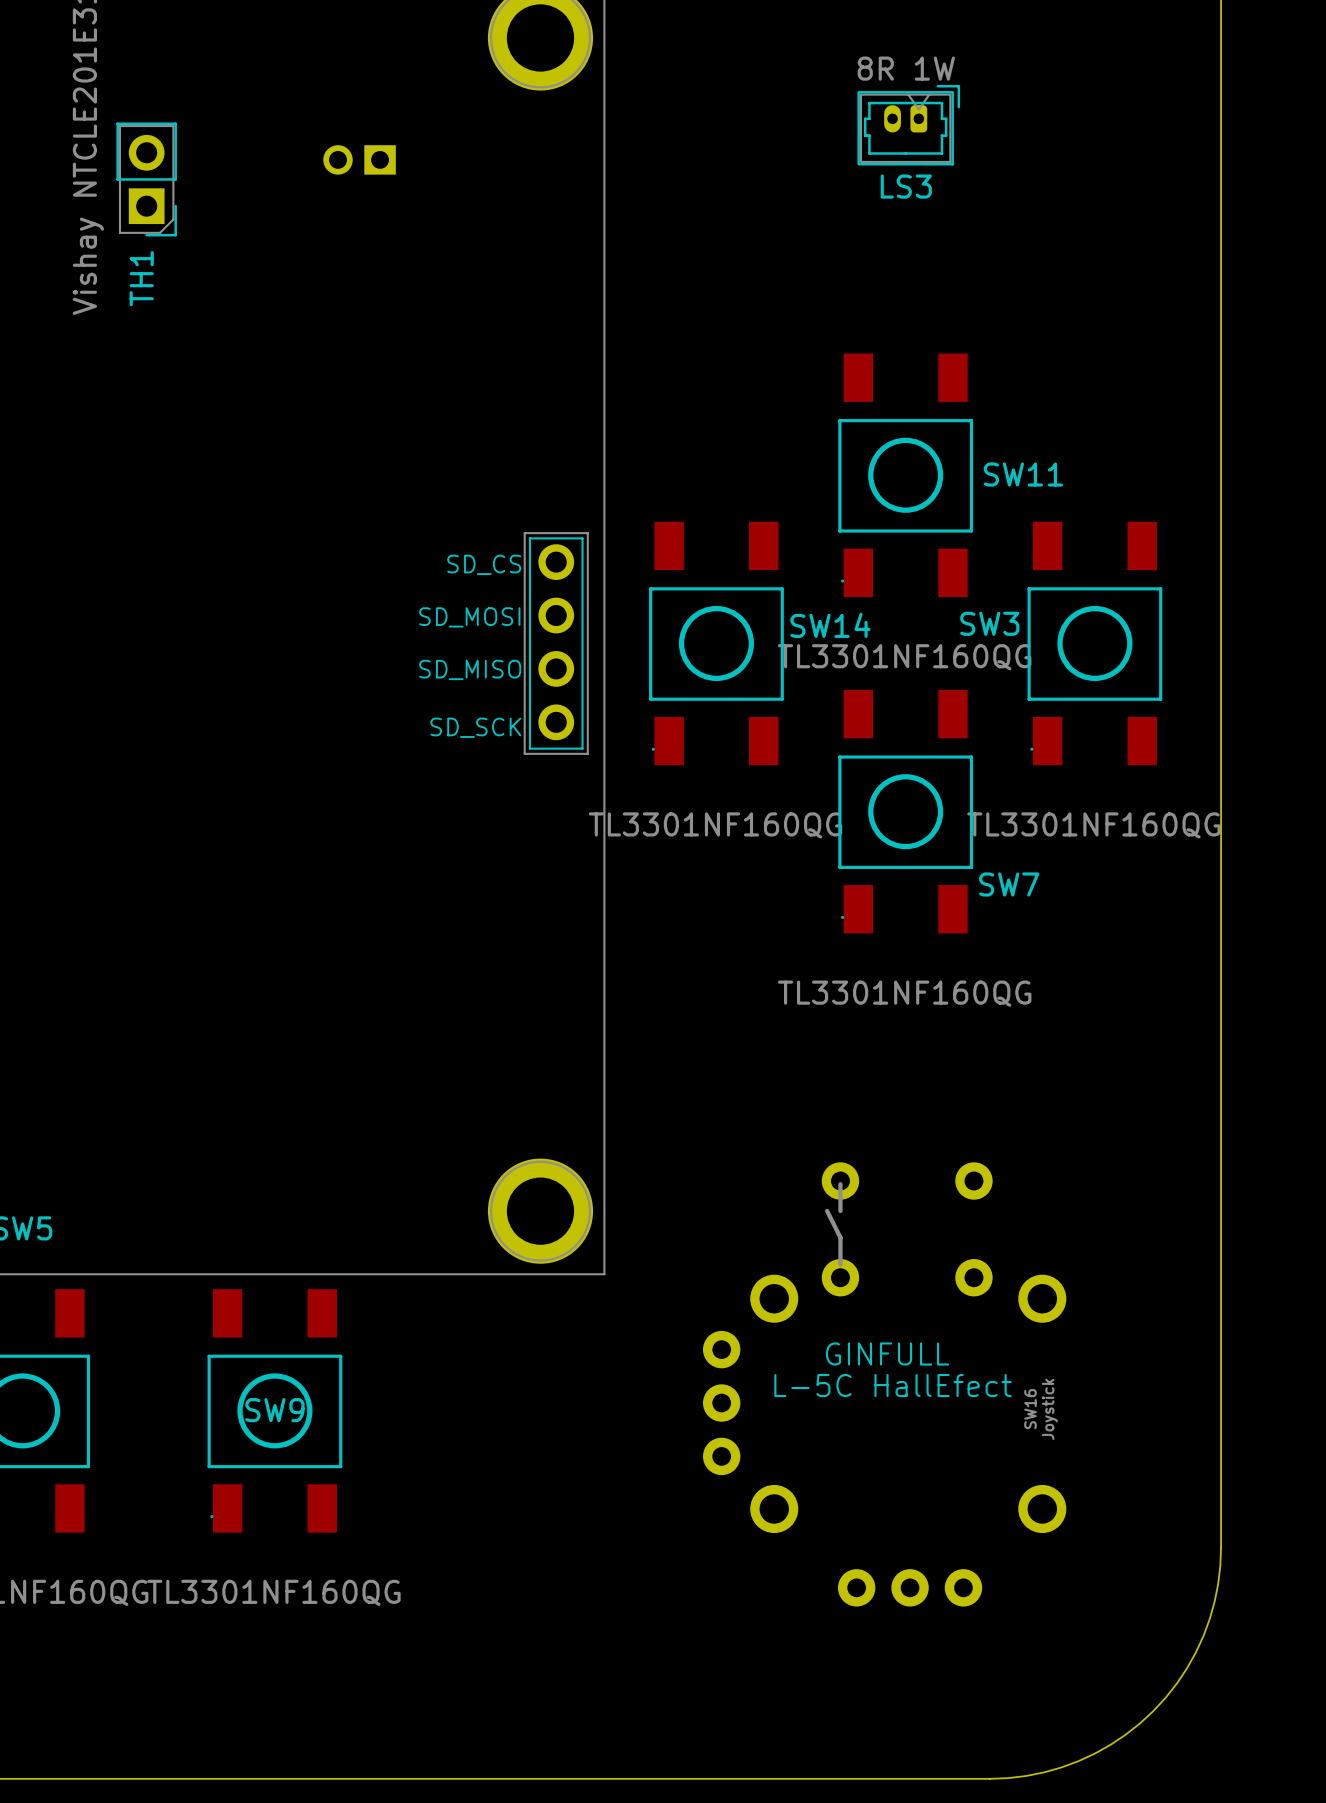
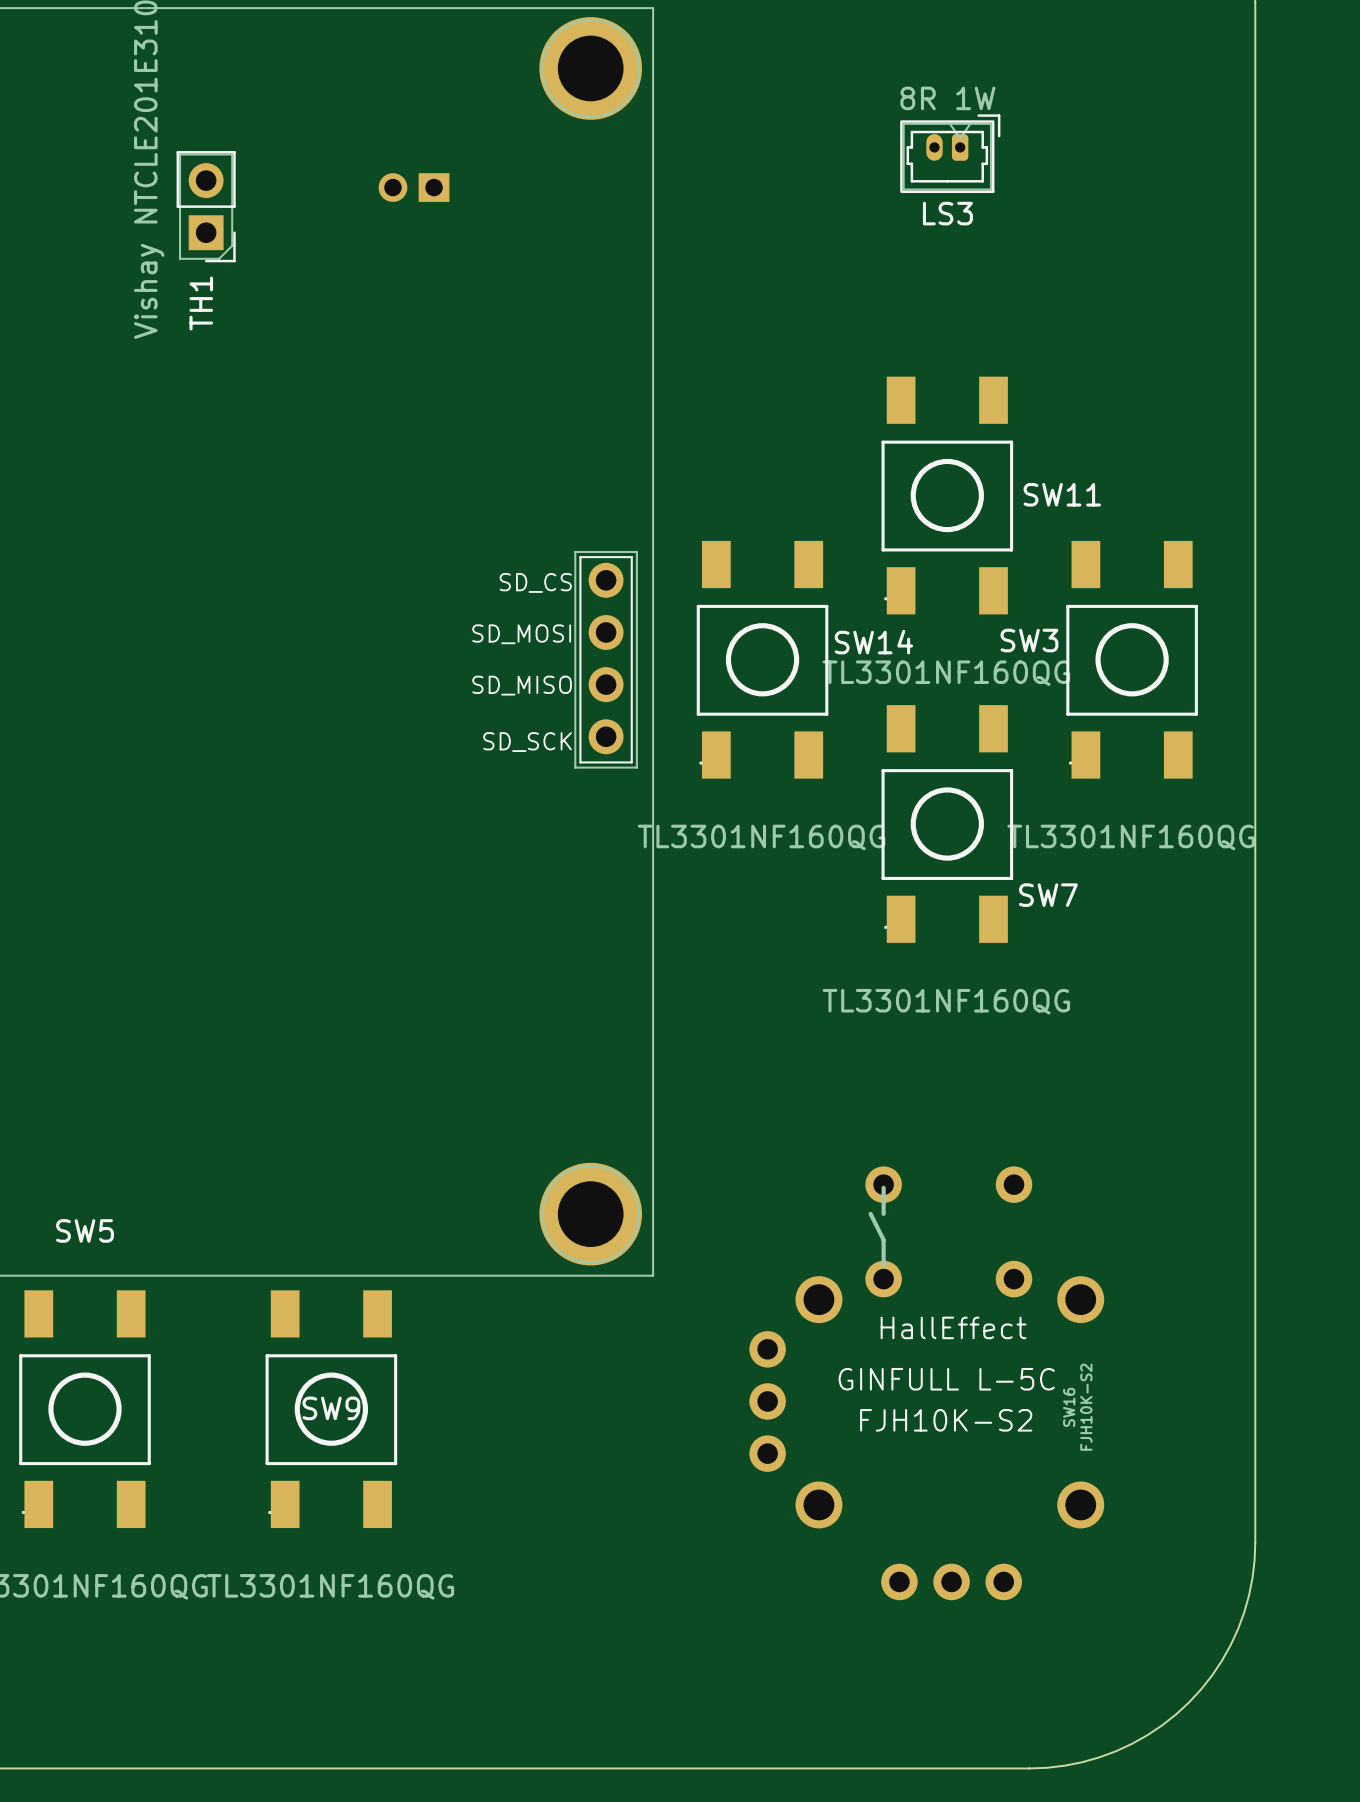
SW16 footprint: [702, 1162, 1067, 1607] -> [749, 1166, 1105, 1601]
SW16 value: Joystick (1049, 1409) -> FJH10K-S2 (1086, 1407)

